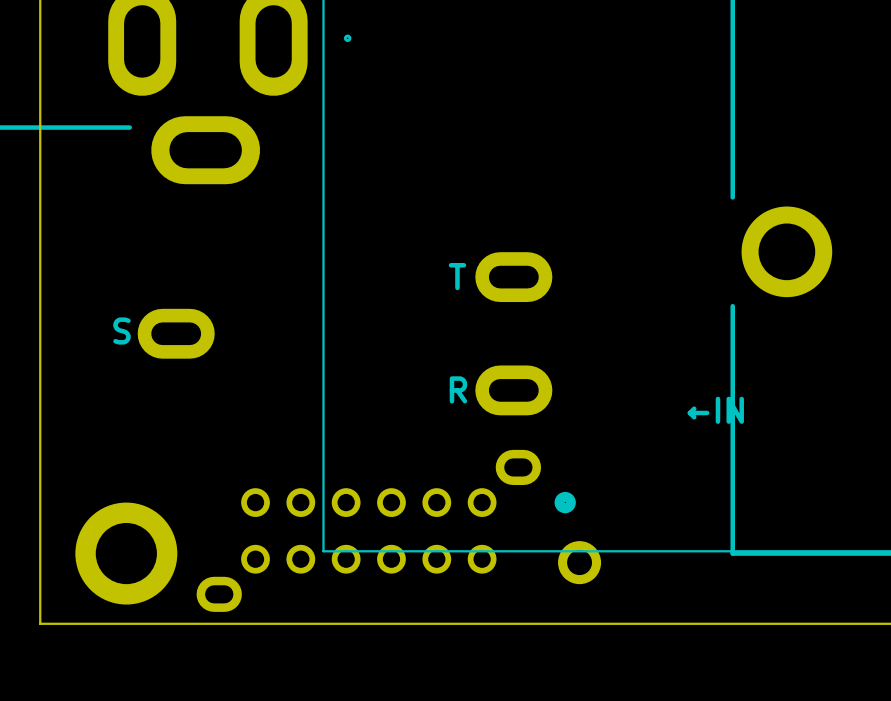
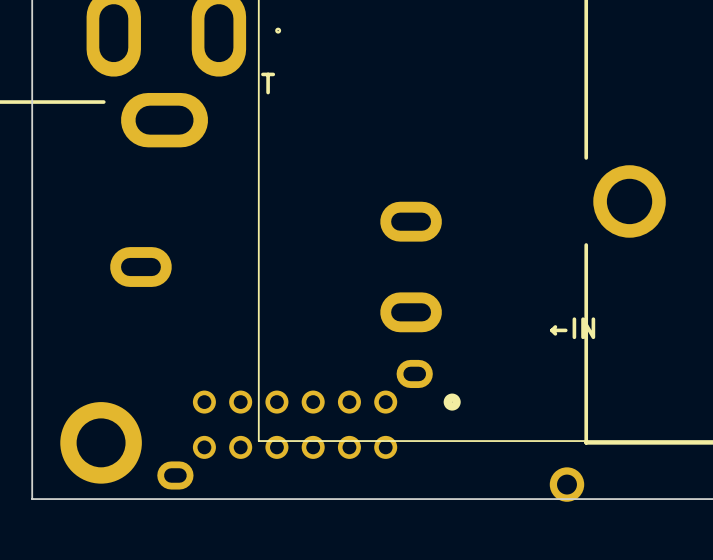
text position: T (457, 276) -> T (268, 83)
text: S (121, 330) -> none
text: R (458, 389) -> none
part position: (579, 562) -> (566, 484)

